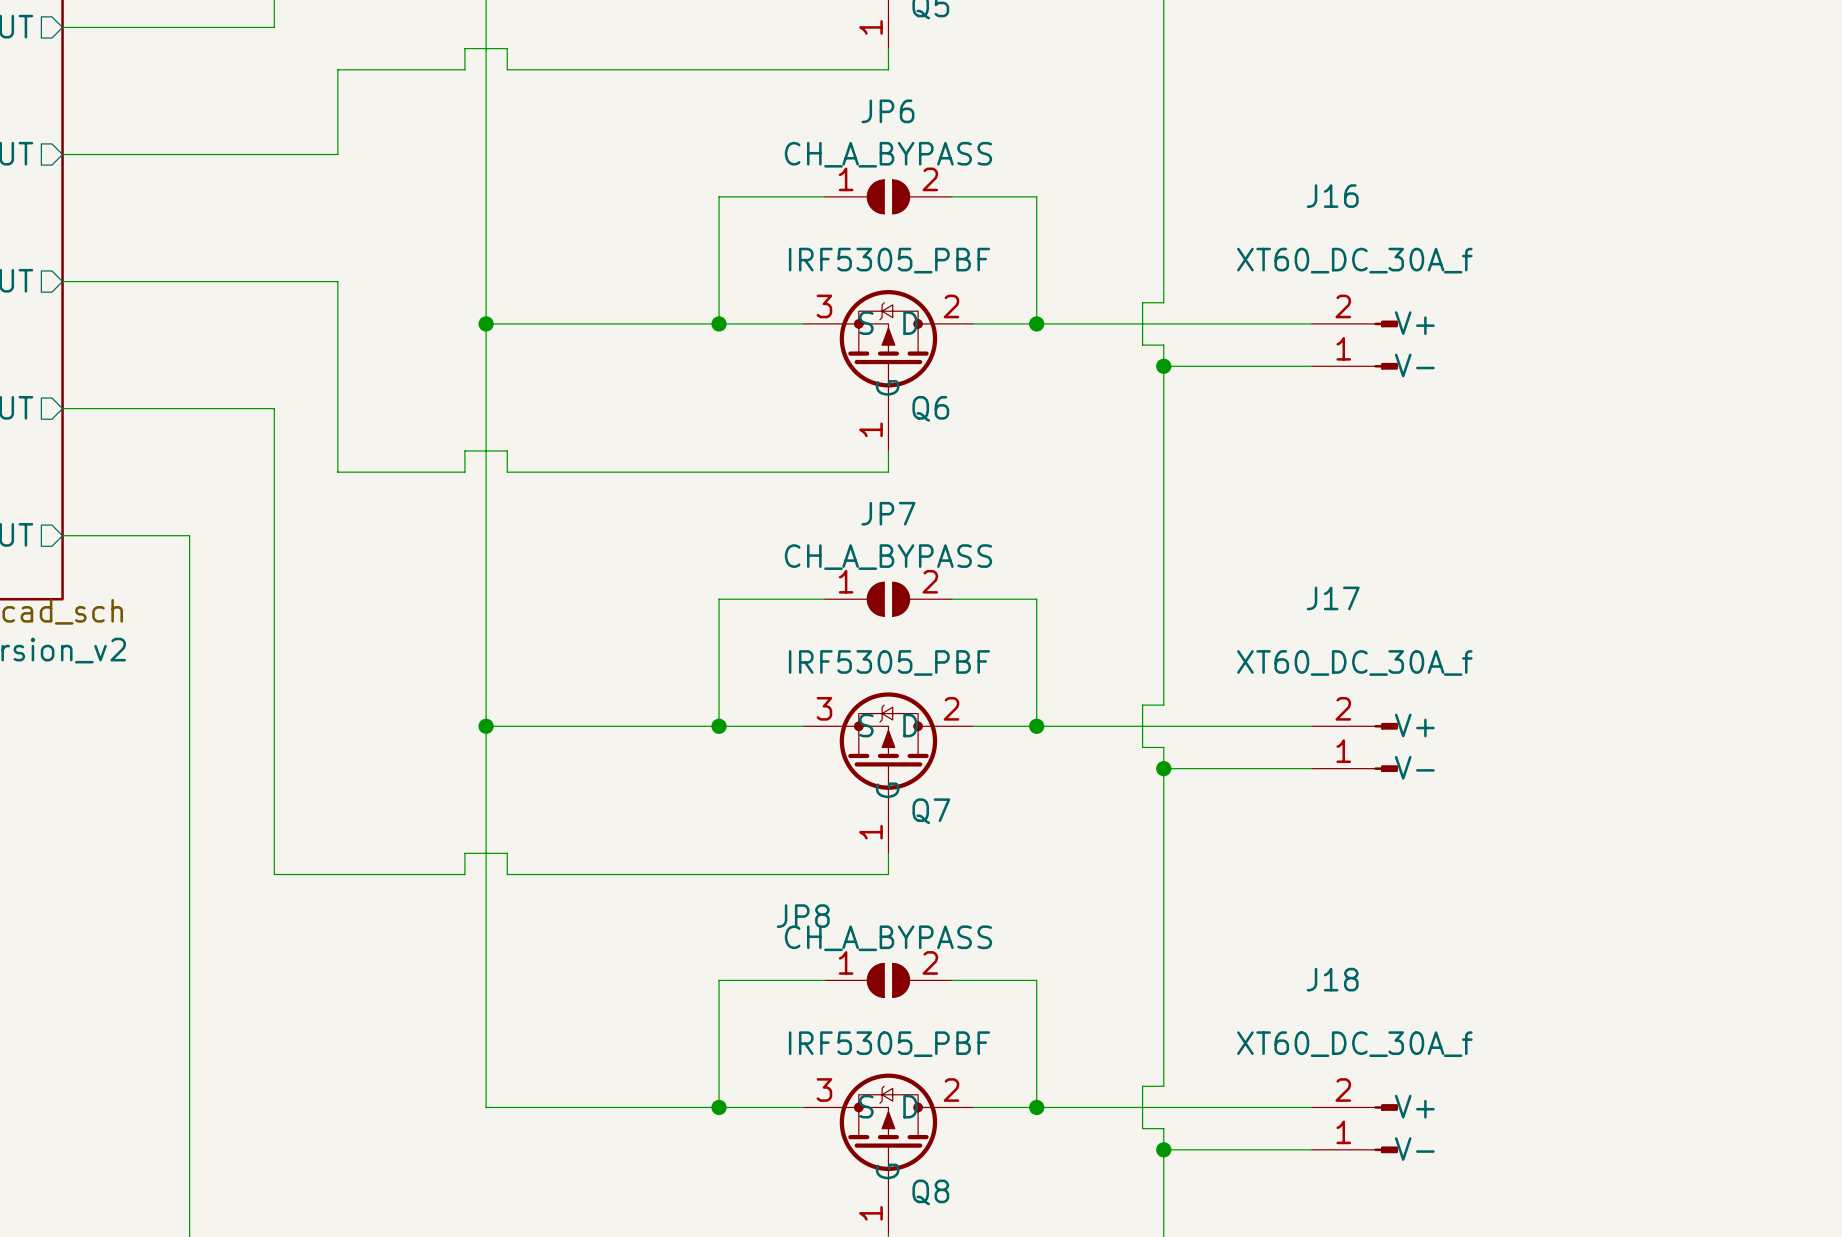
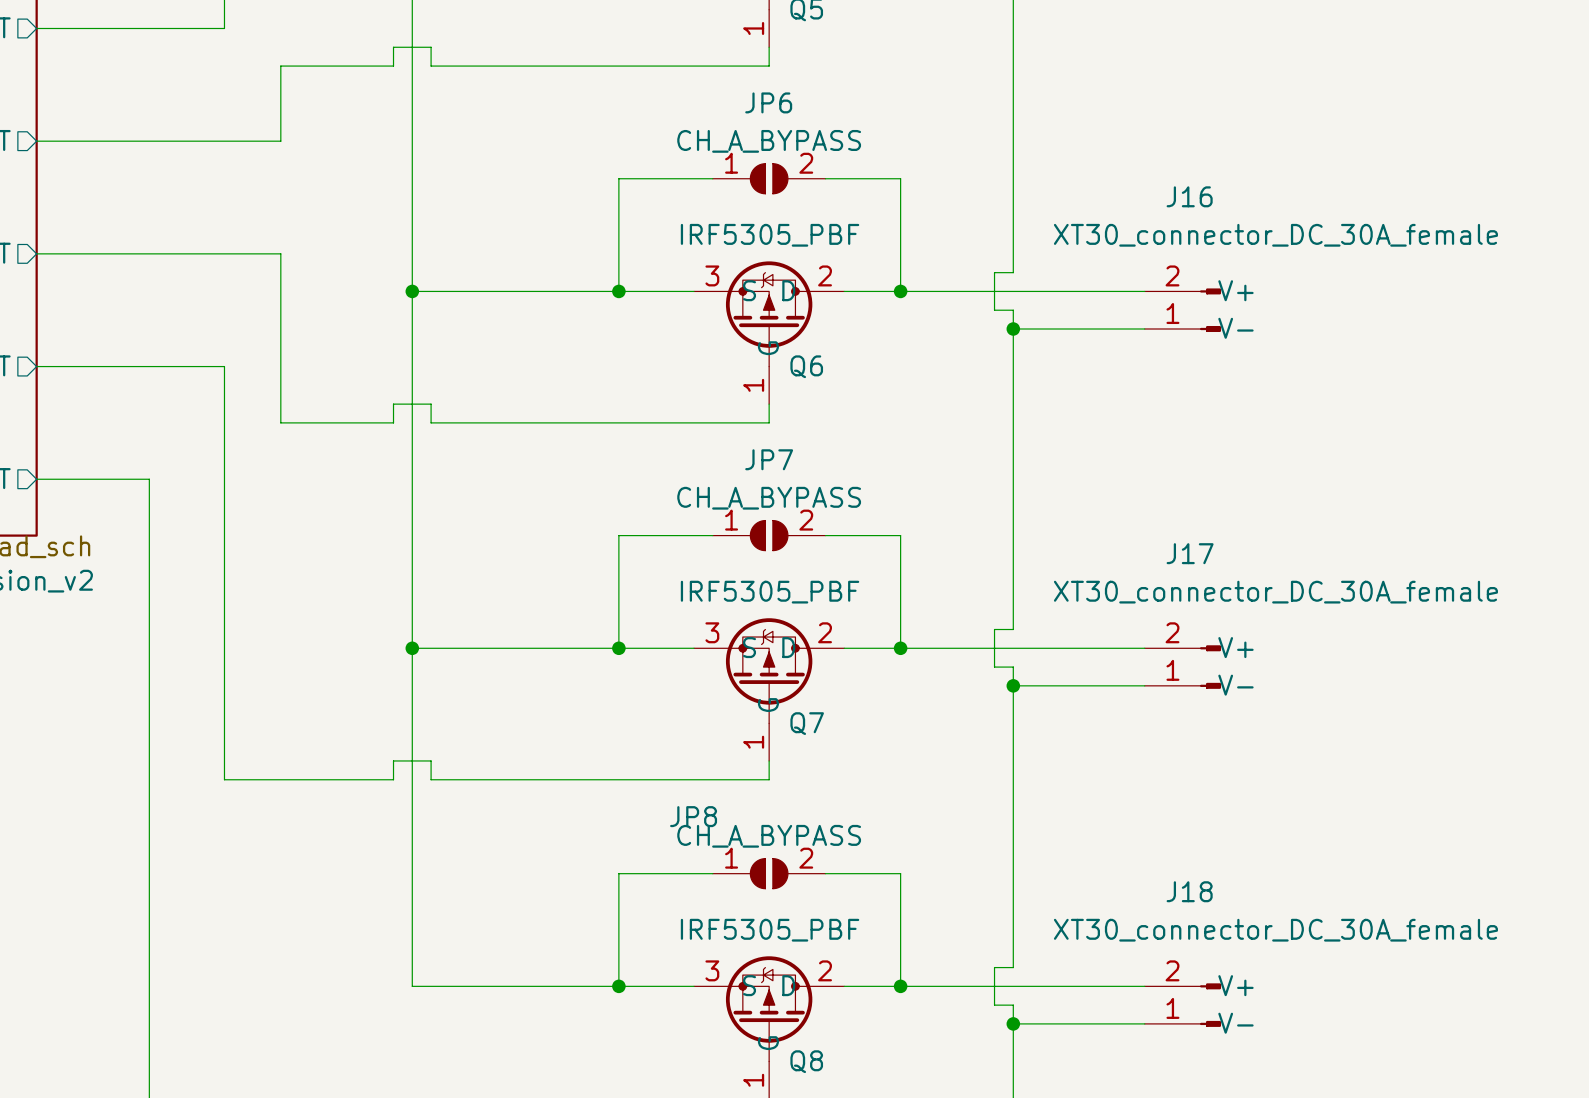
J16 name position: J16 (1332, 196) -> J16 (1189, 196)
J16 value: XT60_DC_30A_f (1354, 260) -> XT30_connector_DC_30A_female (1275, 235)
J17 name position: J17 (1333, 598) -> J17 (1190, 553)
J17 value: XT60_DC_30A_f (1354, 662) -> XT30_connector_DC_30A_female (1275, 592)
J18 name position: J18 (1332, 979) -> J18 (1189, 891)
J18 value: XT60_DC_30A_f (1354, 1044) -> XT30_connector_DC_30A_female (1275, 930)

